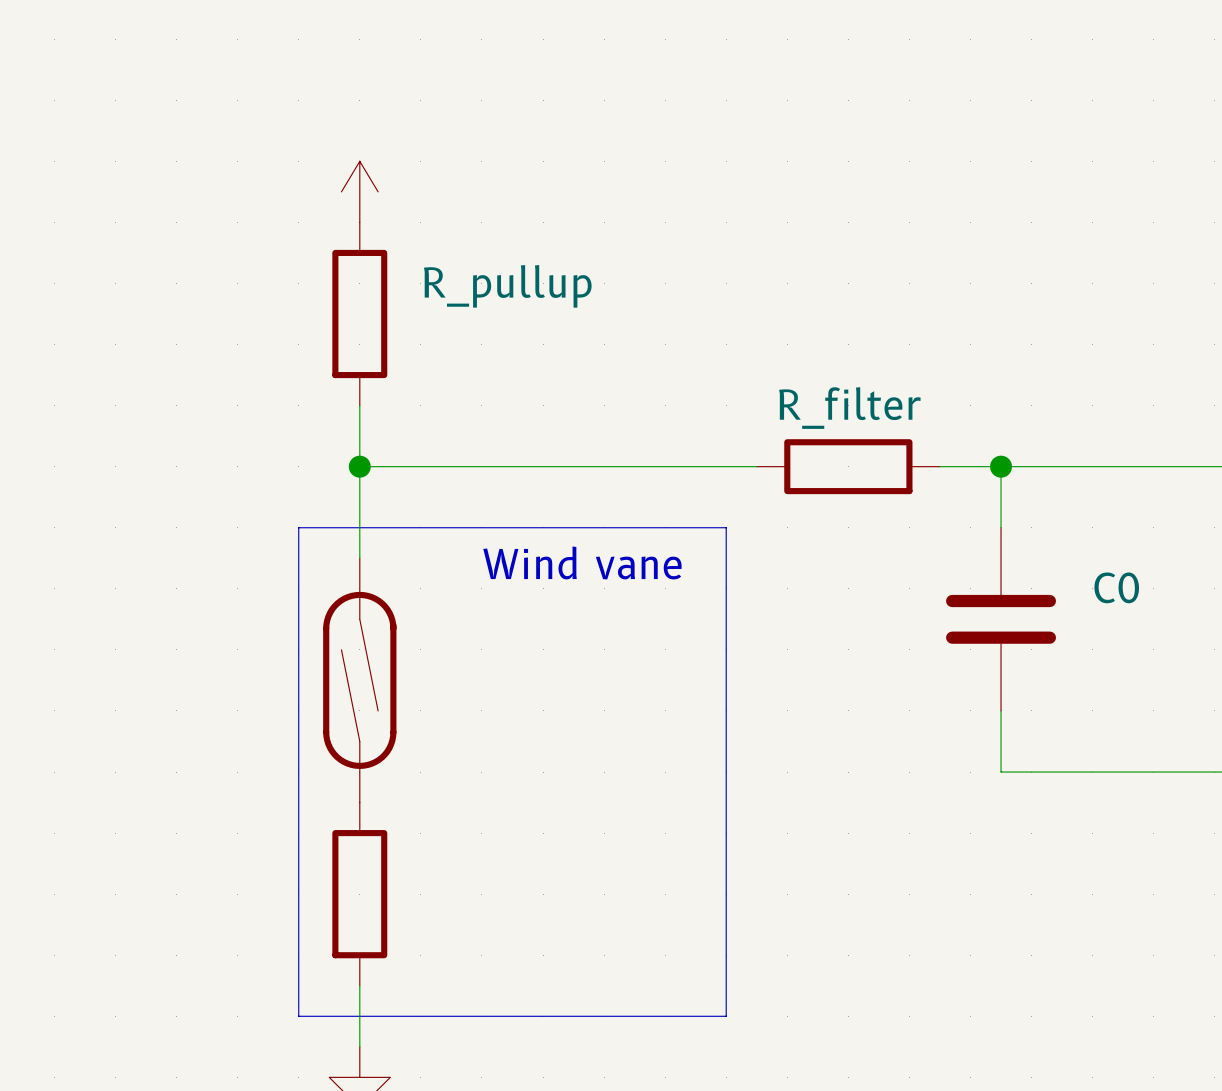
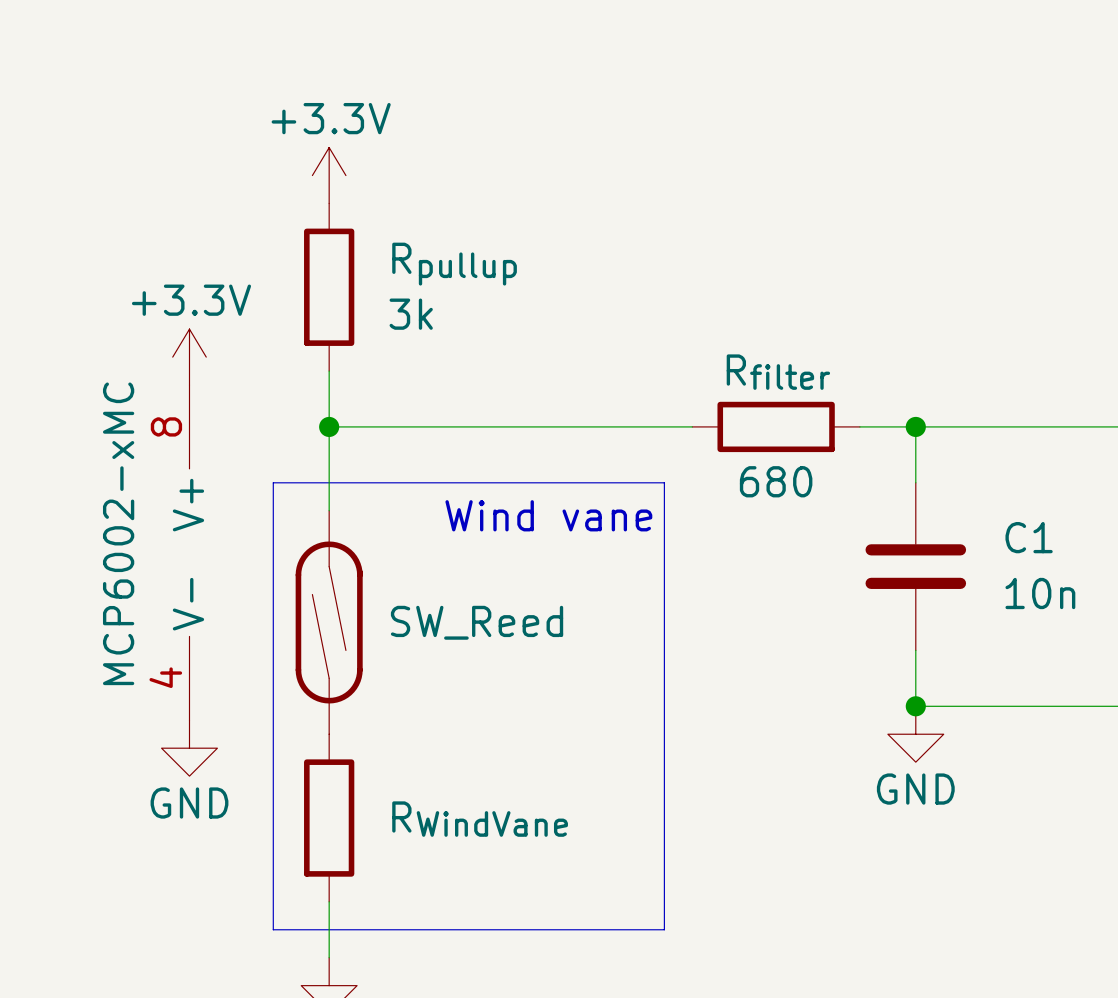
power symbol text: none -> +3.3V (331, 118)
R_pullup name: R_pullup (507, 286) -> Rpullup (454, 264)
R_pullup value: none -> 3k (411, 314)
power symbol: none -> +3.3V (189, 357)
R_filter name: R_filter (849, 408) -> Rfilter (778, 372)
R_filter value: none -> 680 (776, 481)
C0 name: C0 (1116, 587) -> C1 (1029, 537)
part: none -> MCP6002-xMC (189, 552)
C0 value: none -> 10n (1040, 593)
part value: none -> SW_Reed (477, 622)
junction: none -> (915, 706)
power symbol: none -> GND (915, 734)
power symbol: none -> GND (189, 748)
part value: none -> RWindVane (480, 819)

